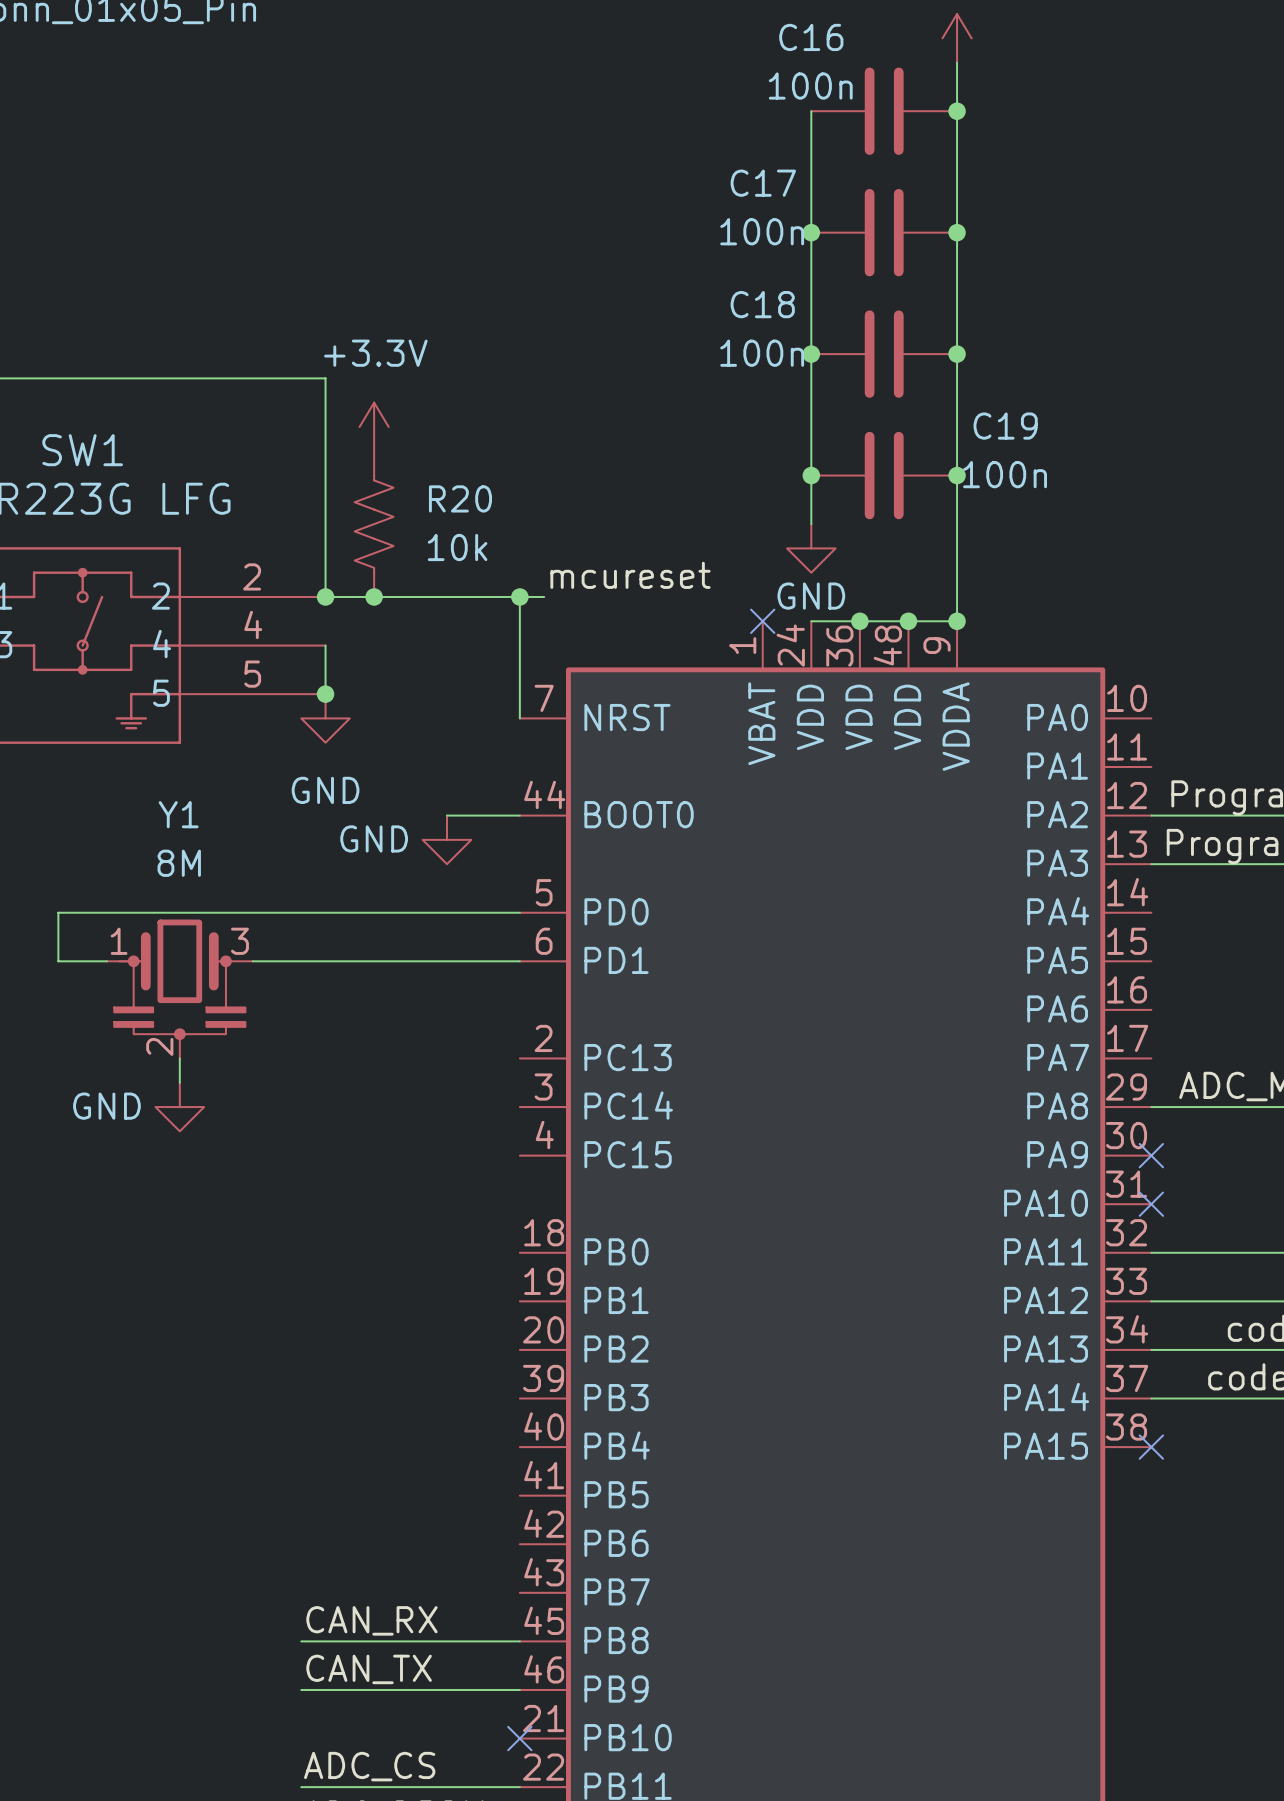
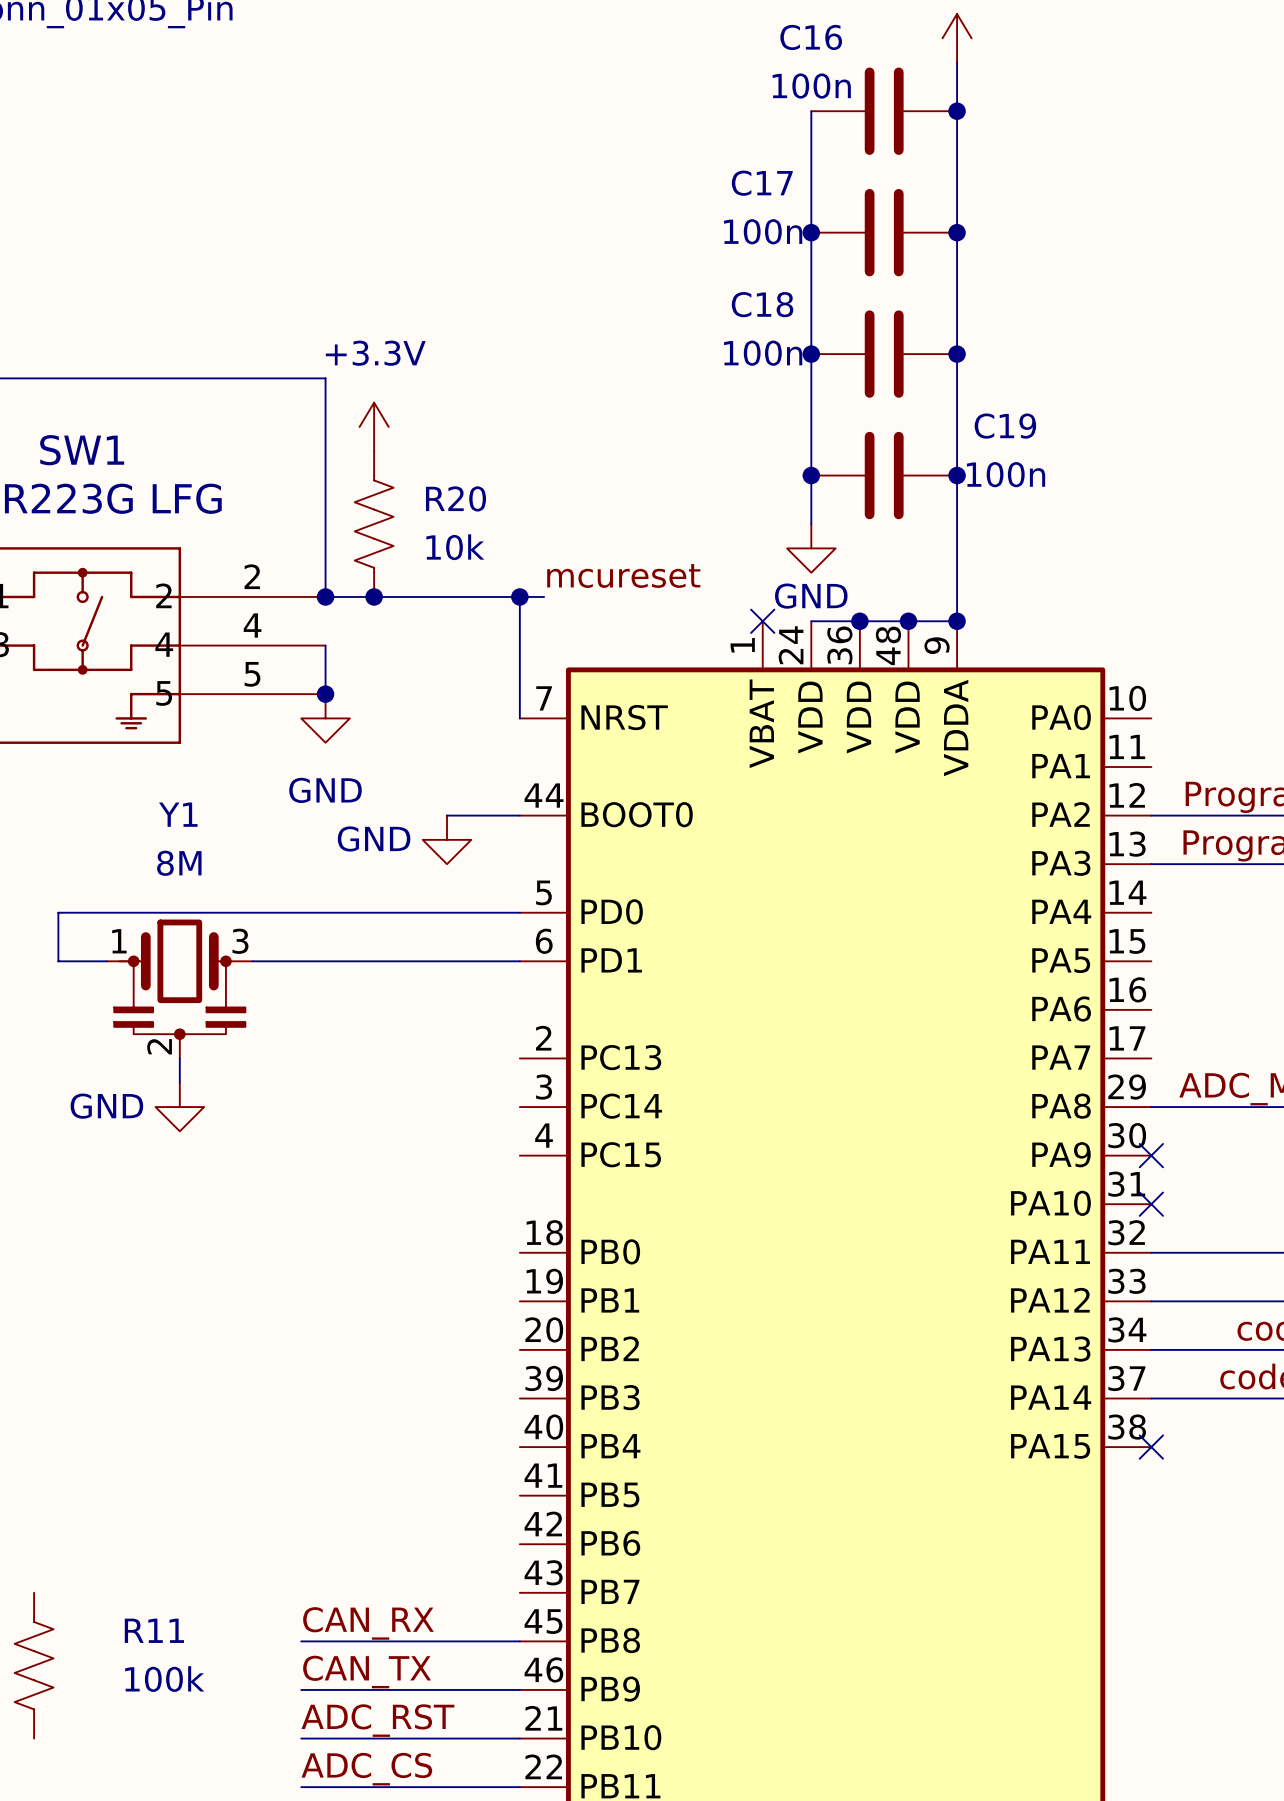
R11: none -> 100k (34, 1665)
label: none -> ADC_RST (377, 1720)
wire: none -> (301, 1738) (519, 1738)
no-connect mark: (519, 1738) -> none

